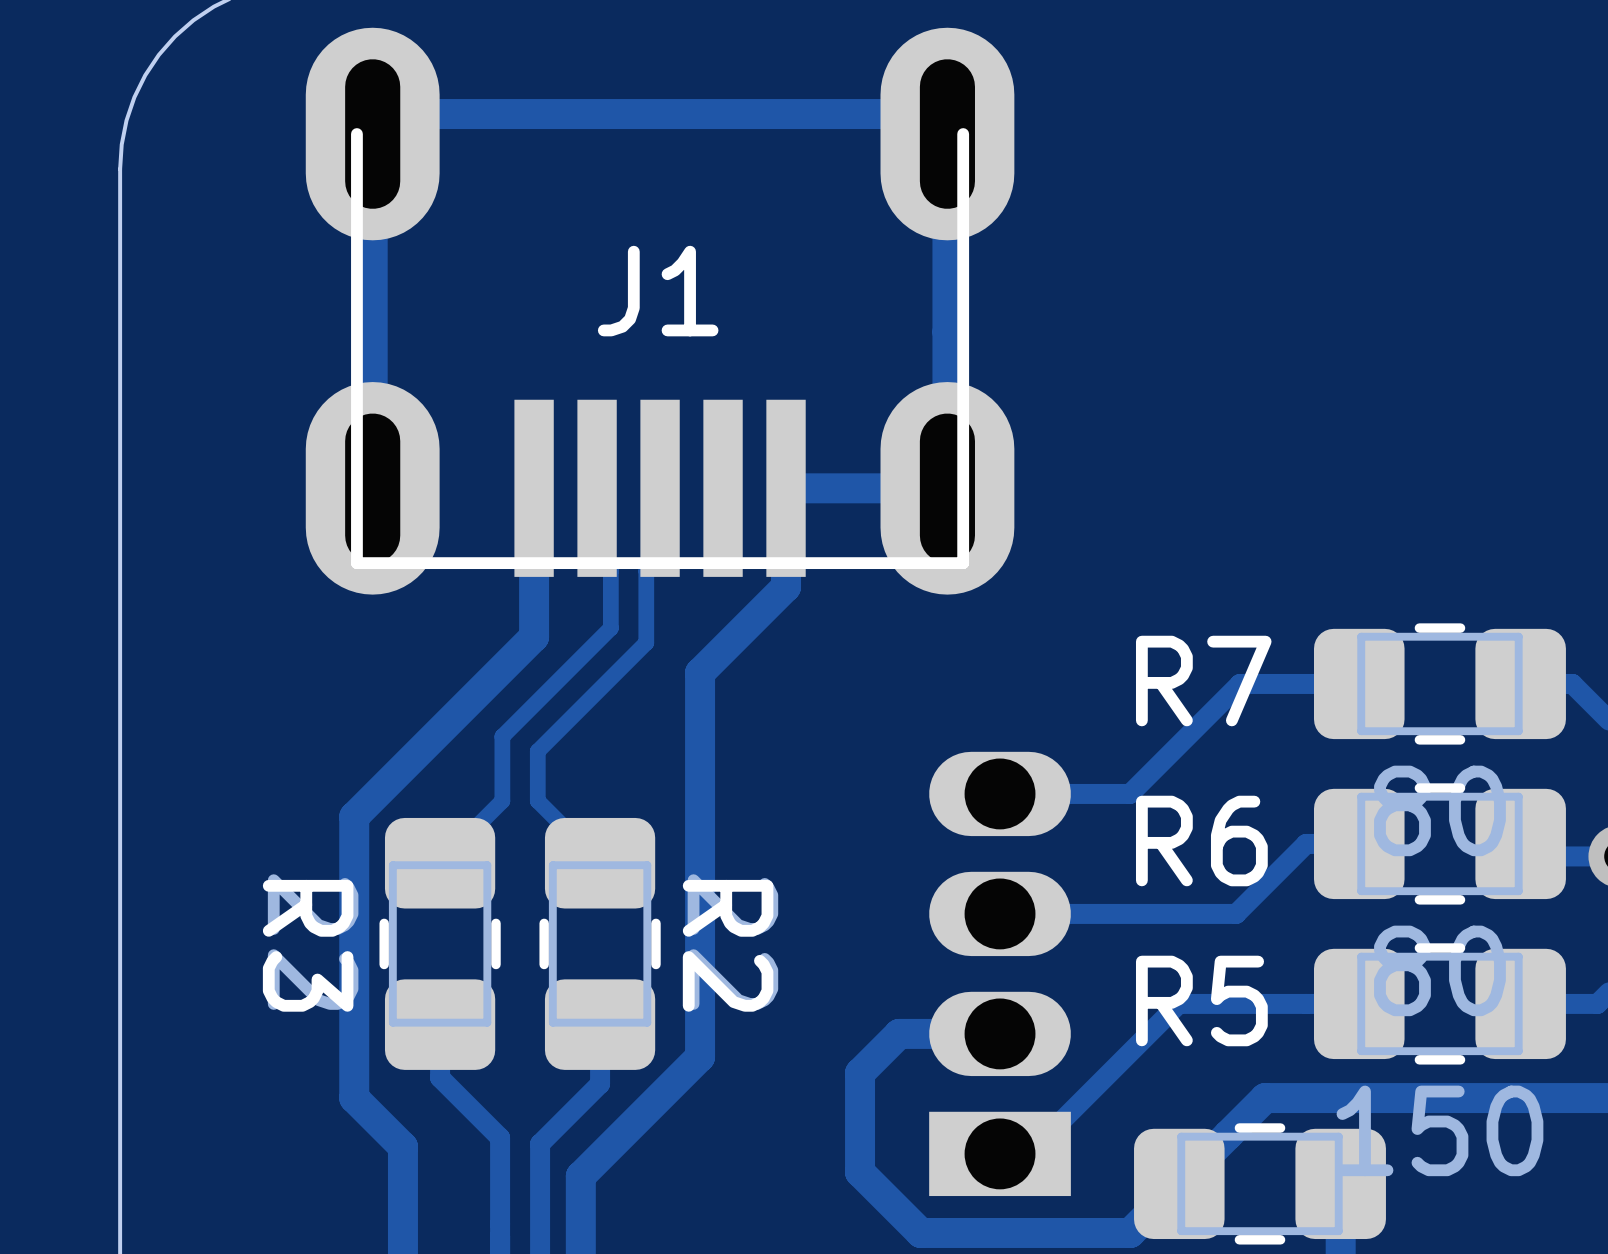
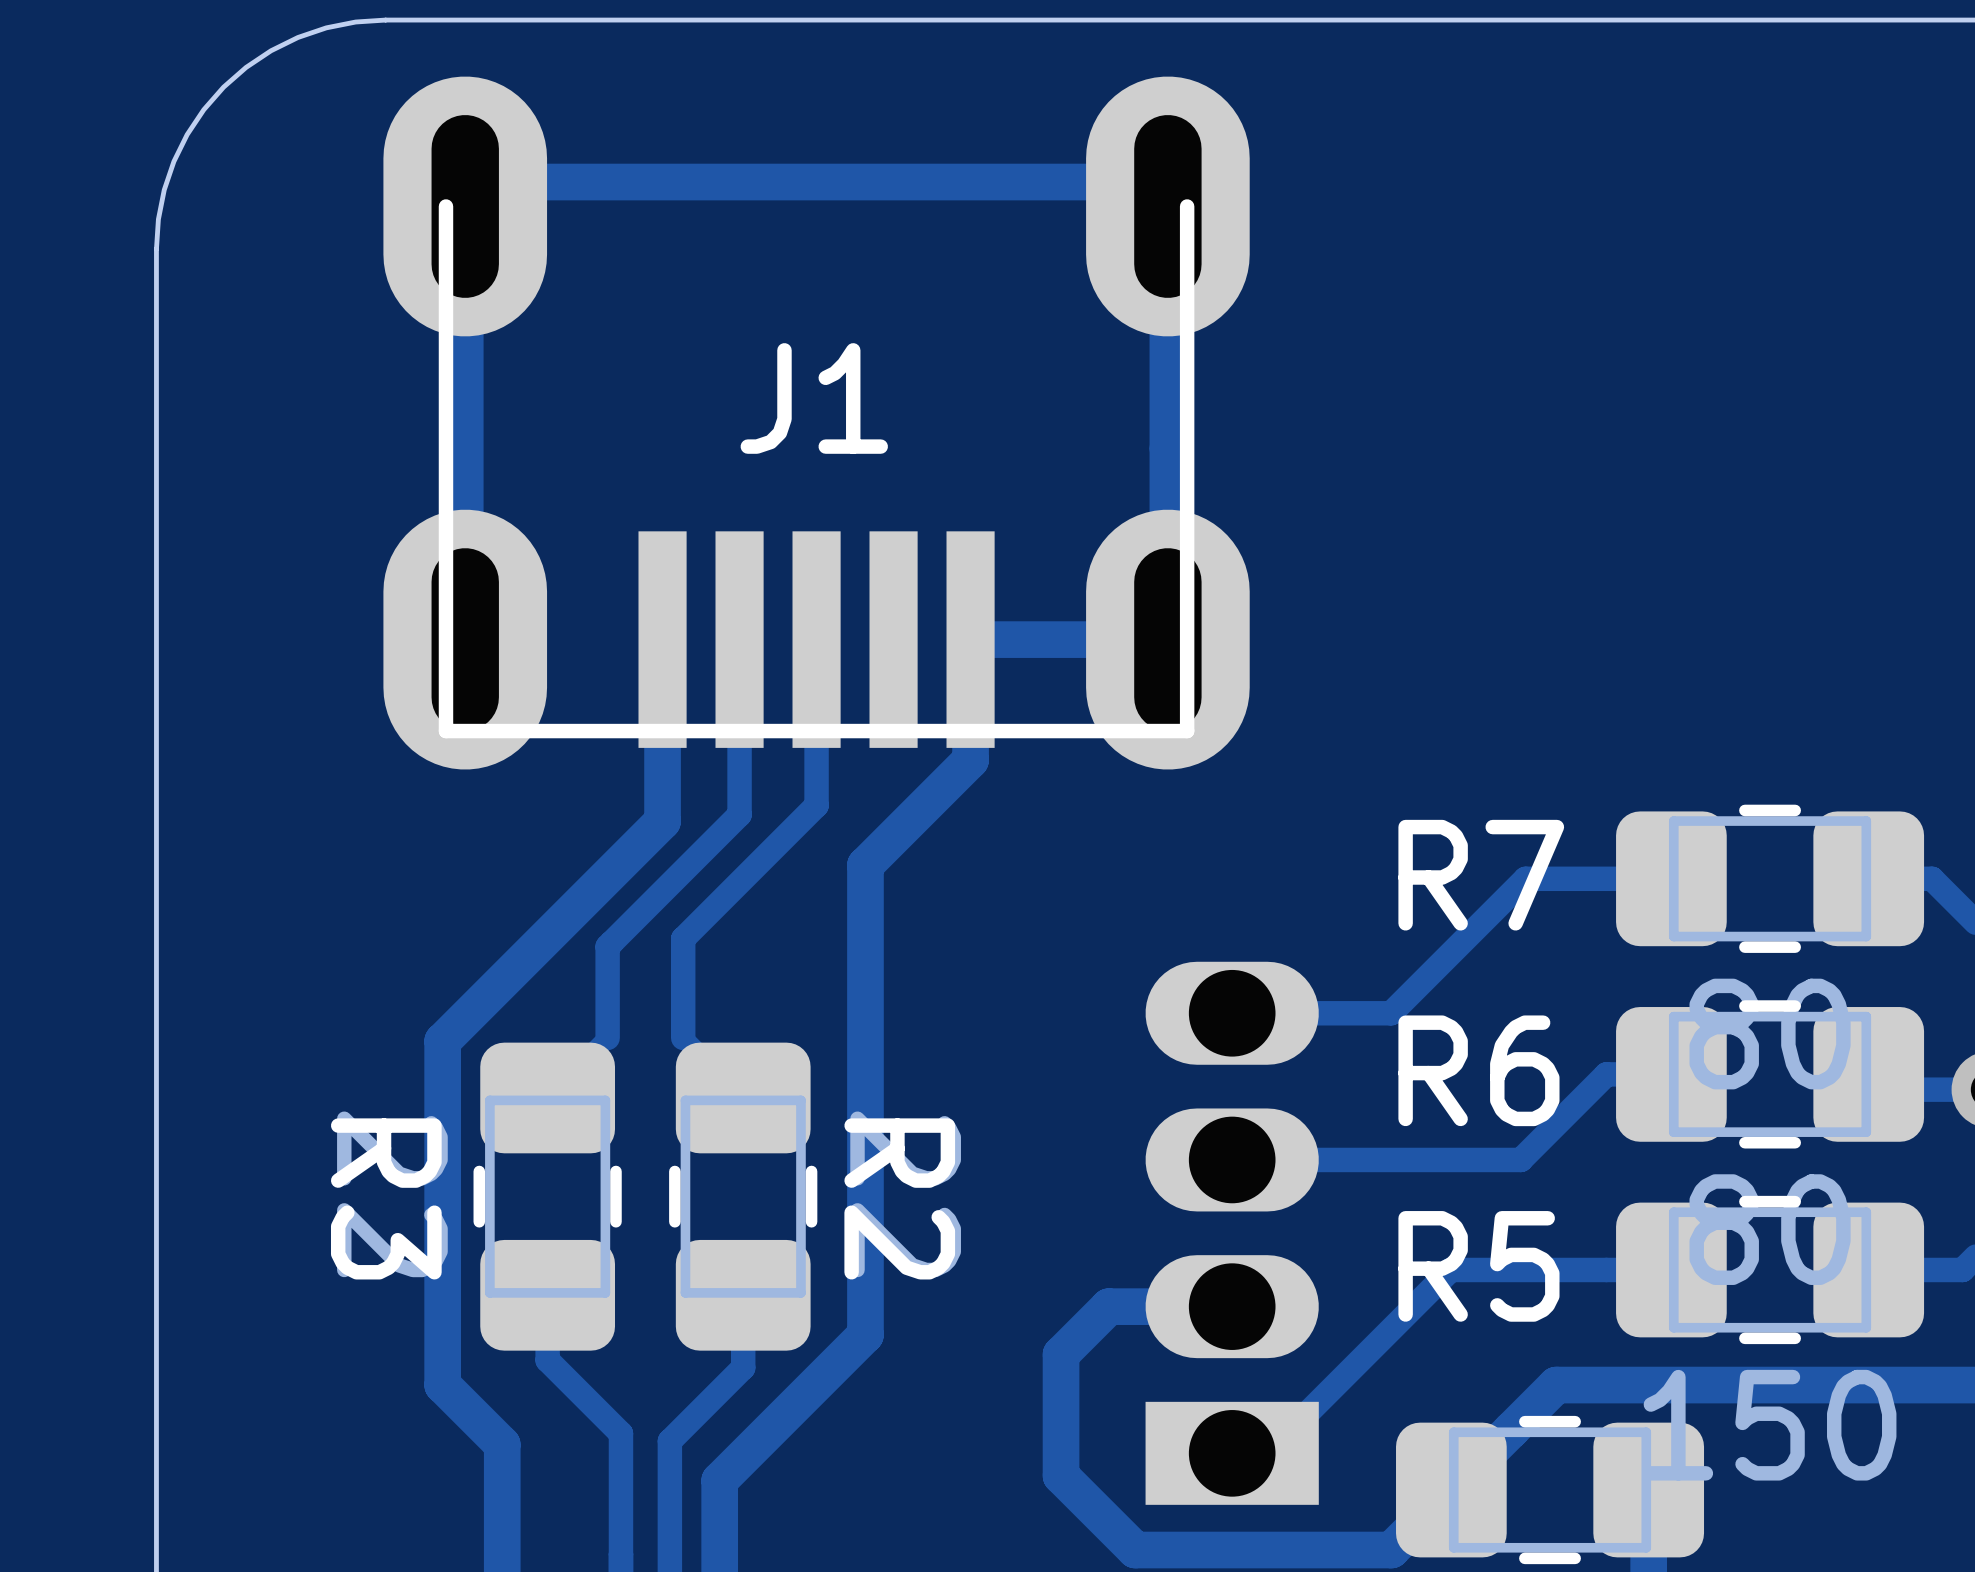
track: (597, 557) (610, 570) (610, 628) (502, 736) (502, 800) (489, 814) -> (739, 723) (739, 814) (607, 946) (607, 1037)
track: (660, 557) (646, 570) (646, 642) (537, 751) (537, 800) (550, 814) -> (816, 723) (816, 805) (683, 938) (683, 1037)

